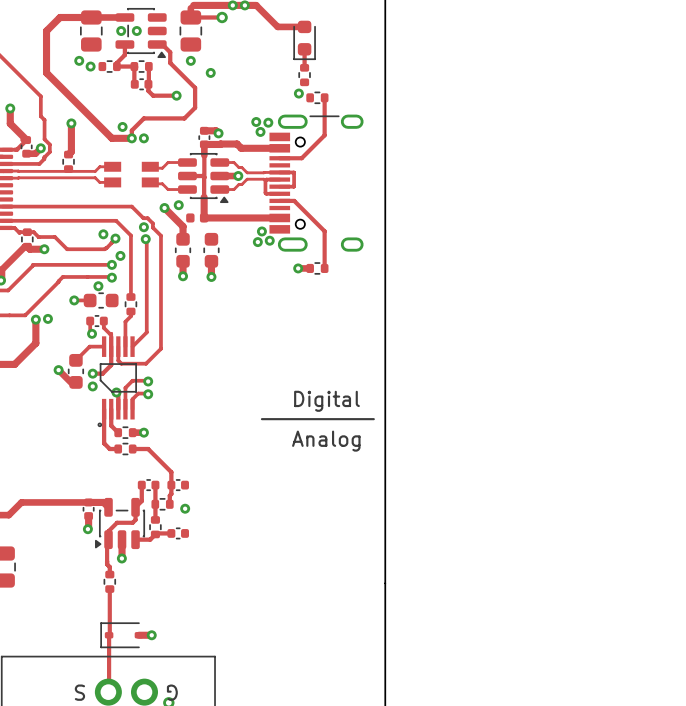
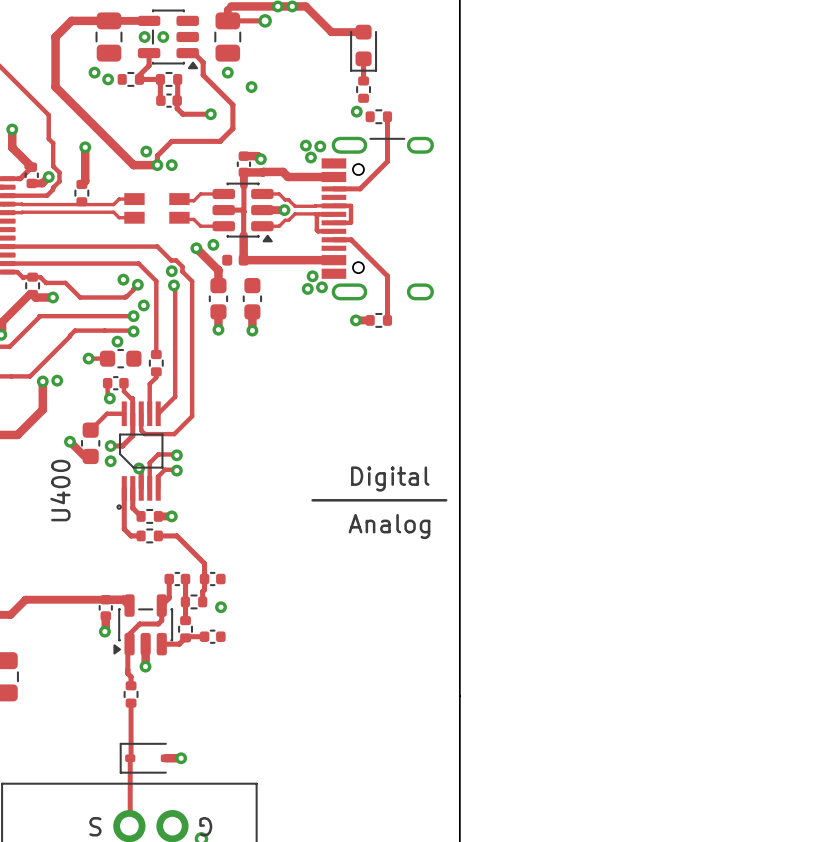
U400 name: none -> U400 (60, 490)

